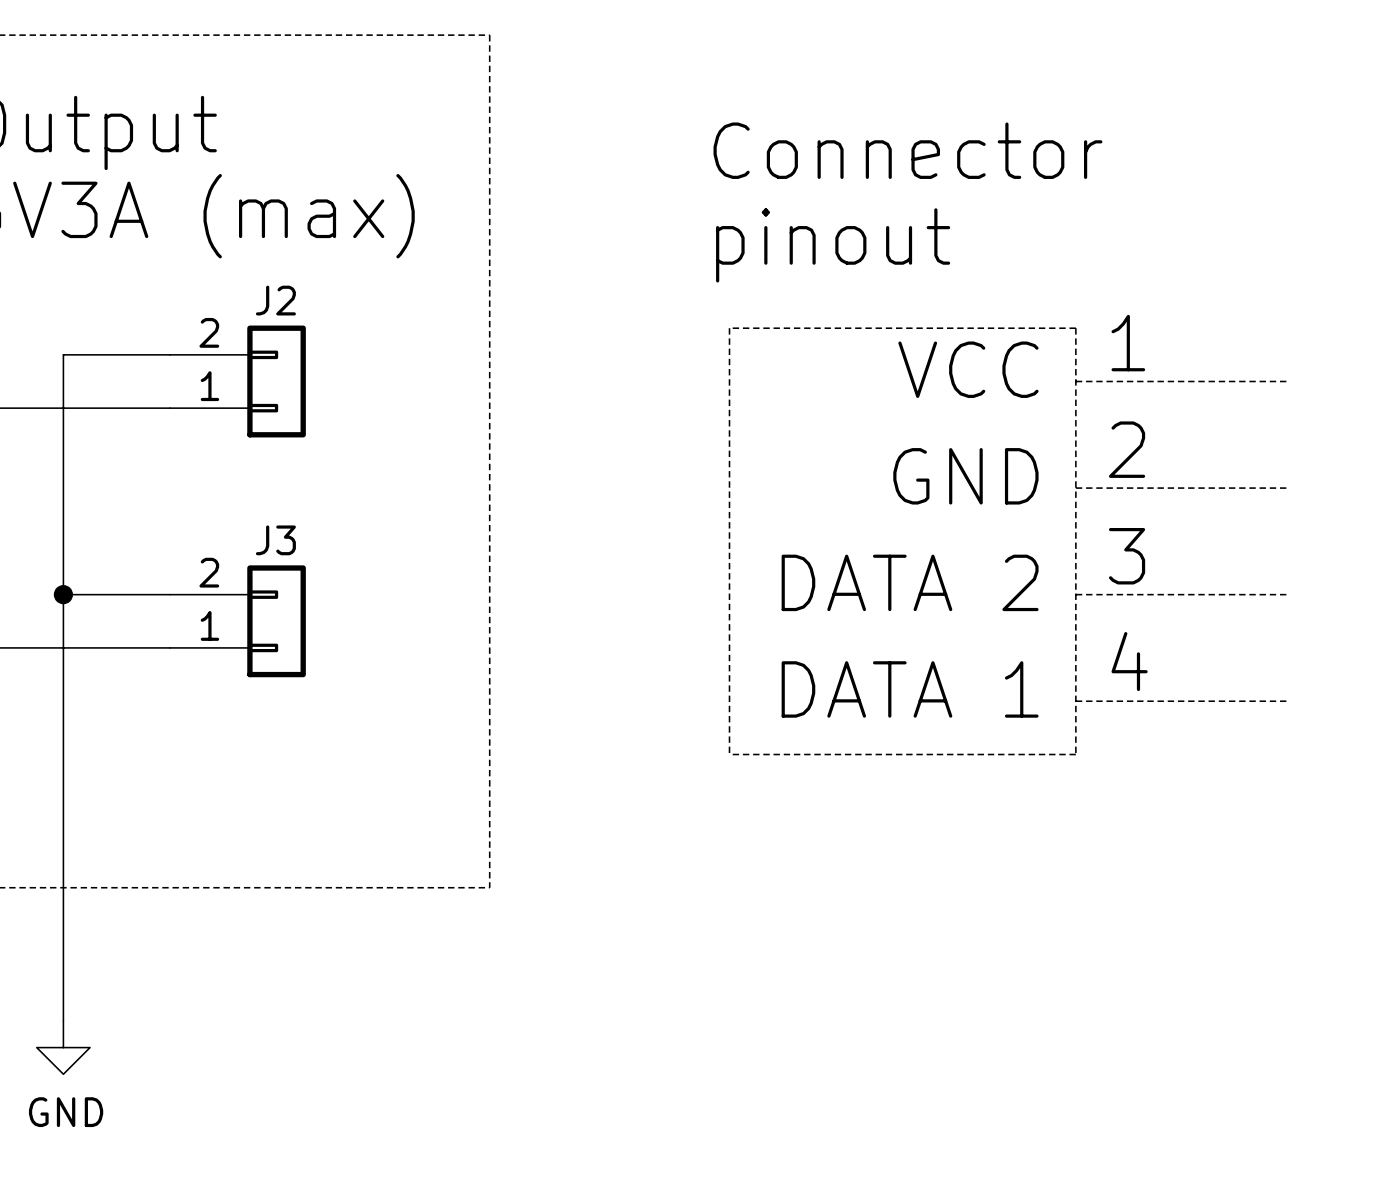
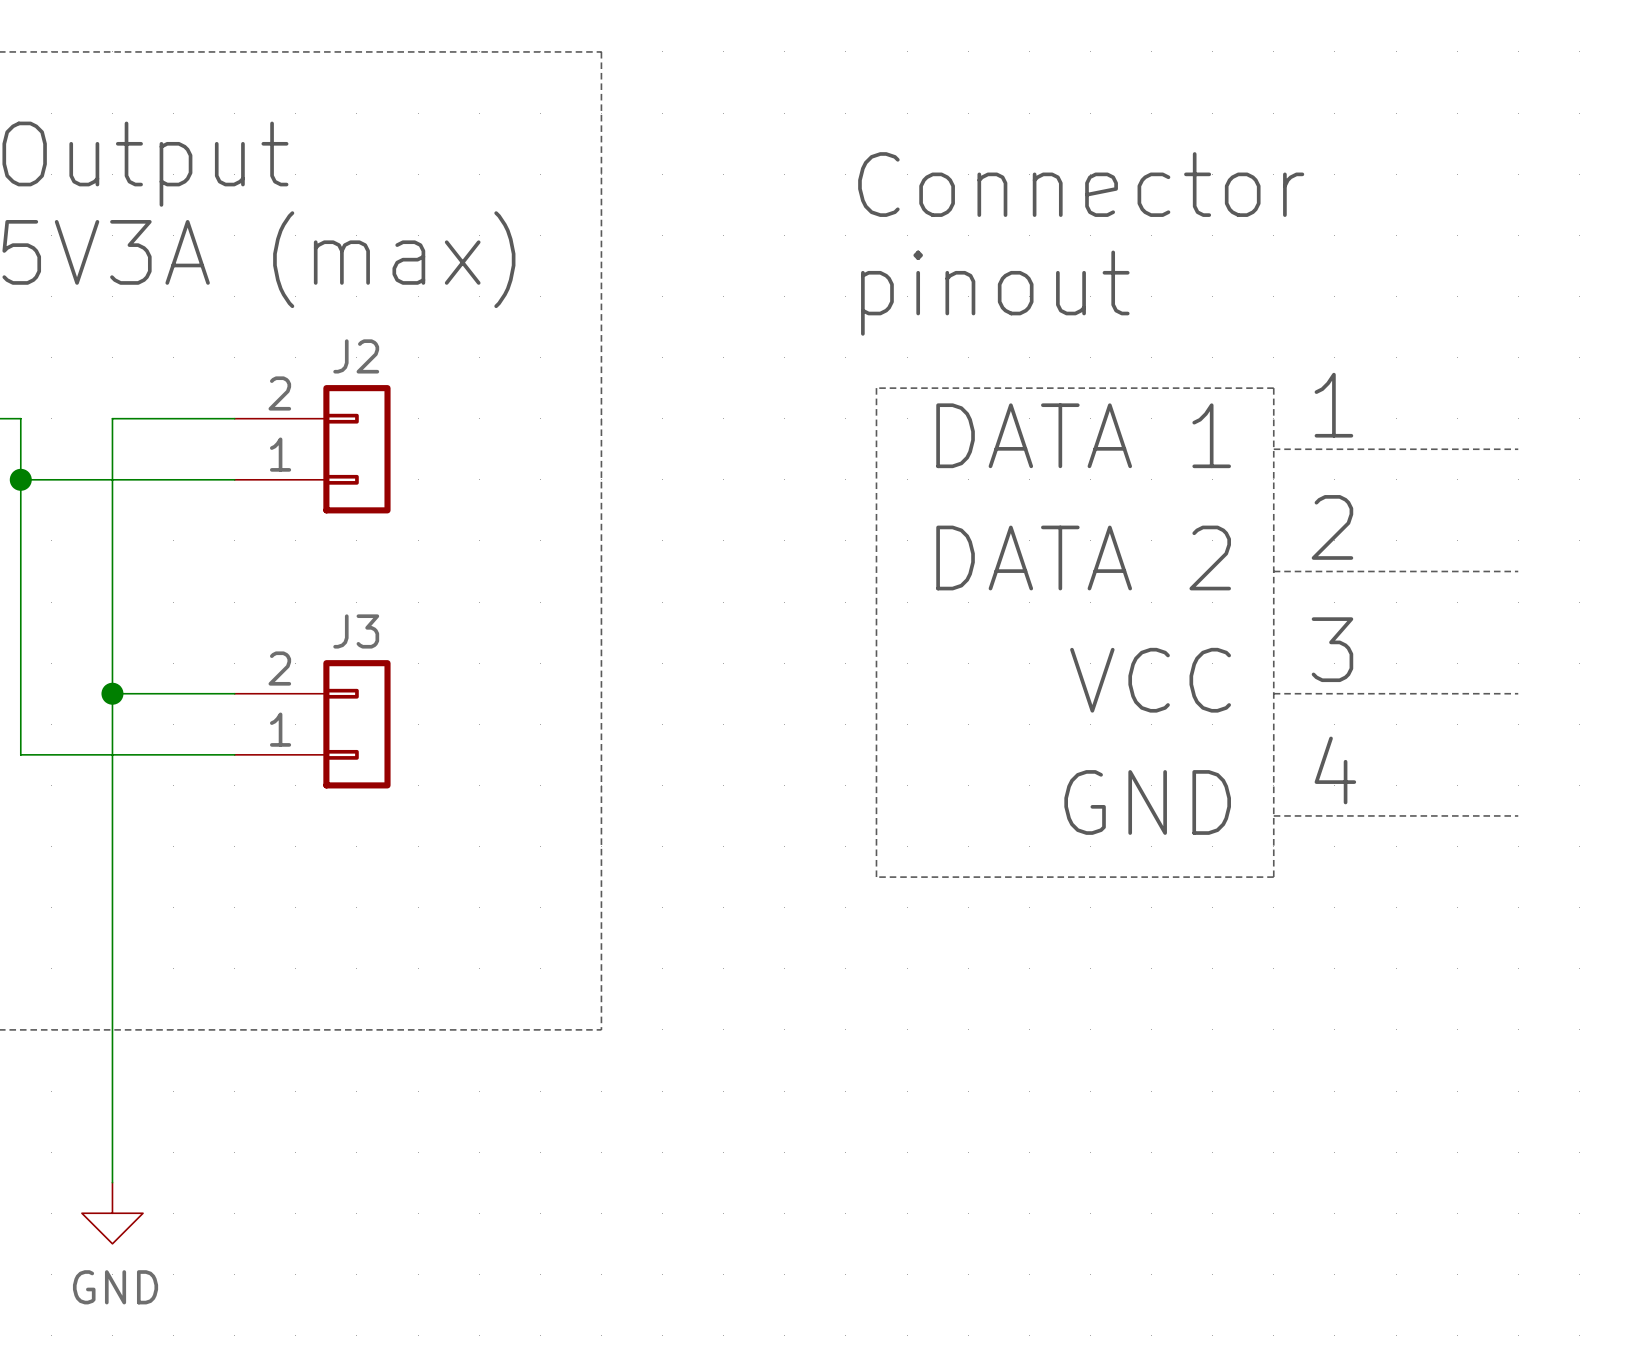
text: VCC (968, 369) -> DATA 1 (1083, 435)
text: GND (965, 476) -> DATA 2 (1083, 557)
text: DATA 2 (910, 582) -> VCC (1150, 680)
text: DATA 1 (910, 689) -> GND (1147, 802)

